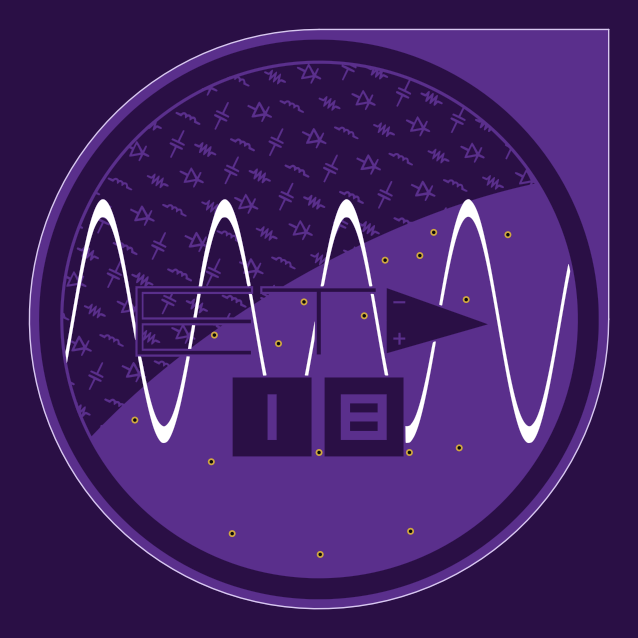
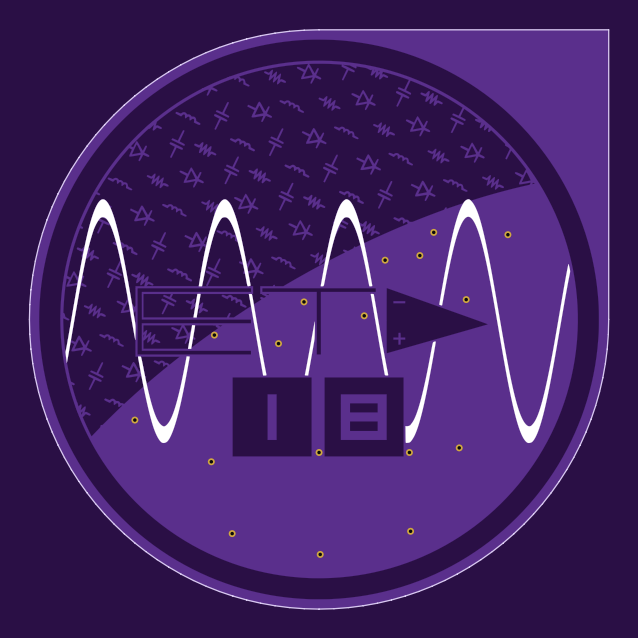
drawing shape: [28, 28, 610, 610] -> [28, 29, 610, 610]

